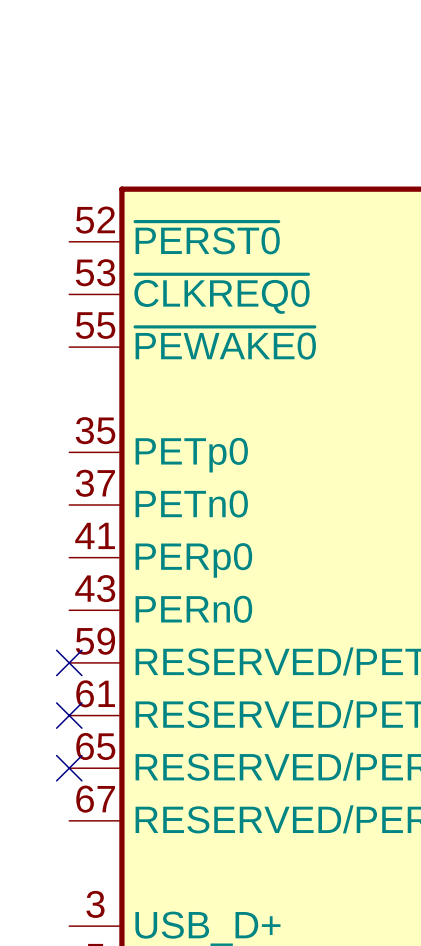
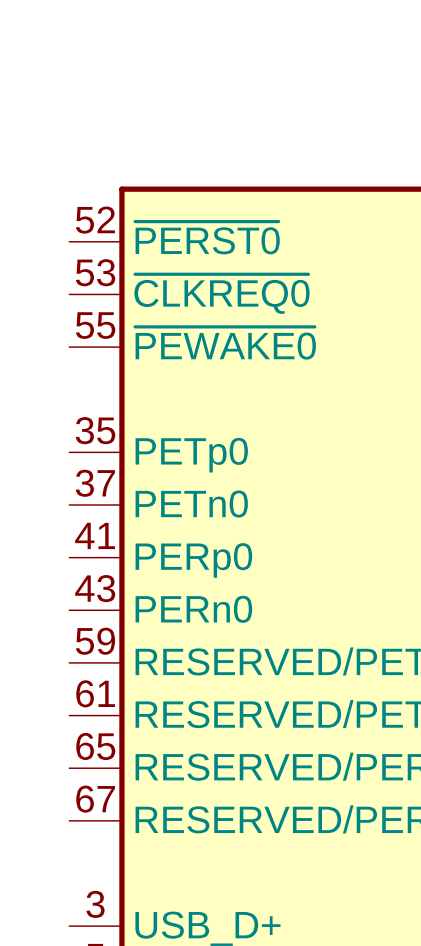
no-connect mark: (69, 662) -> none
no-connect mark: (69, 715) -> none
no-connect mark: (69, 768) -> none

